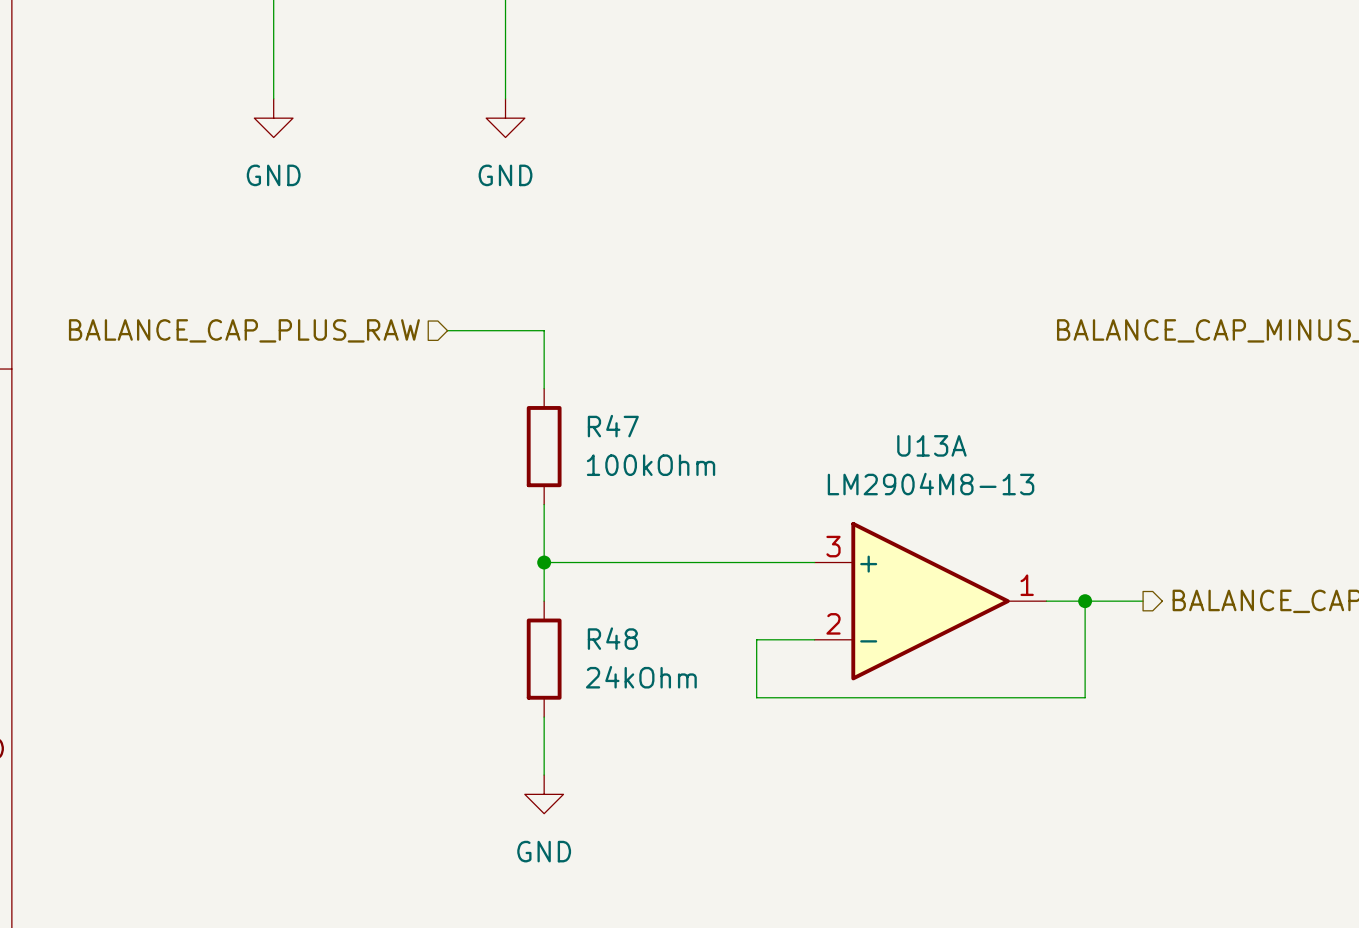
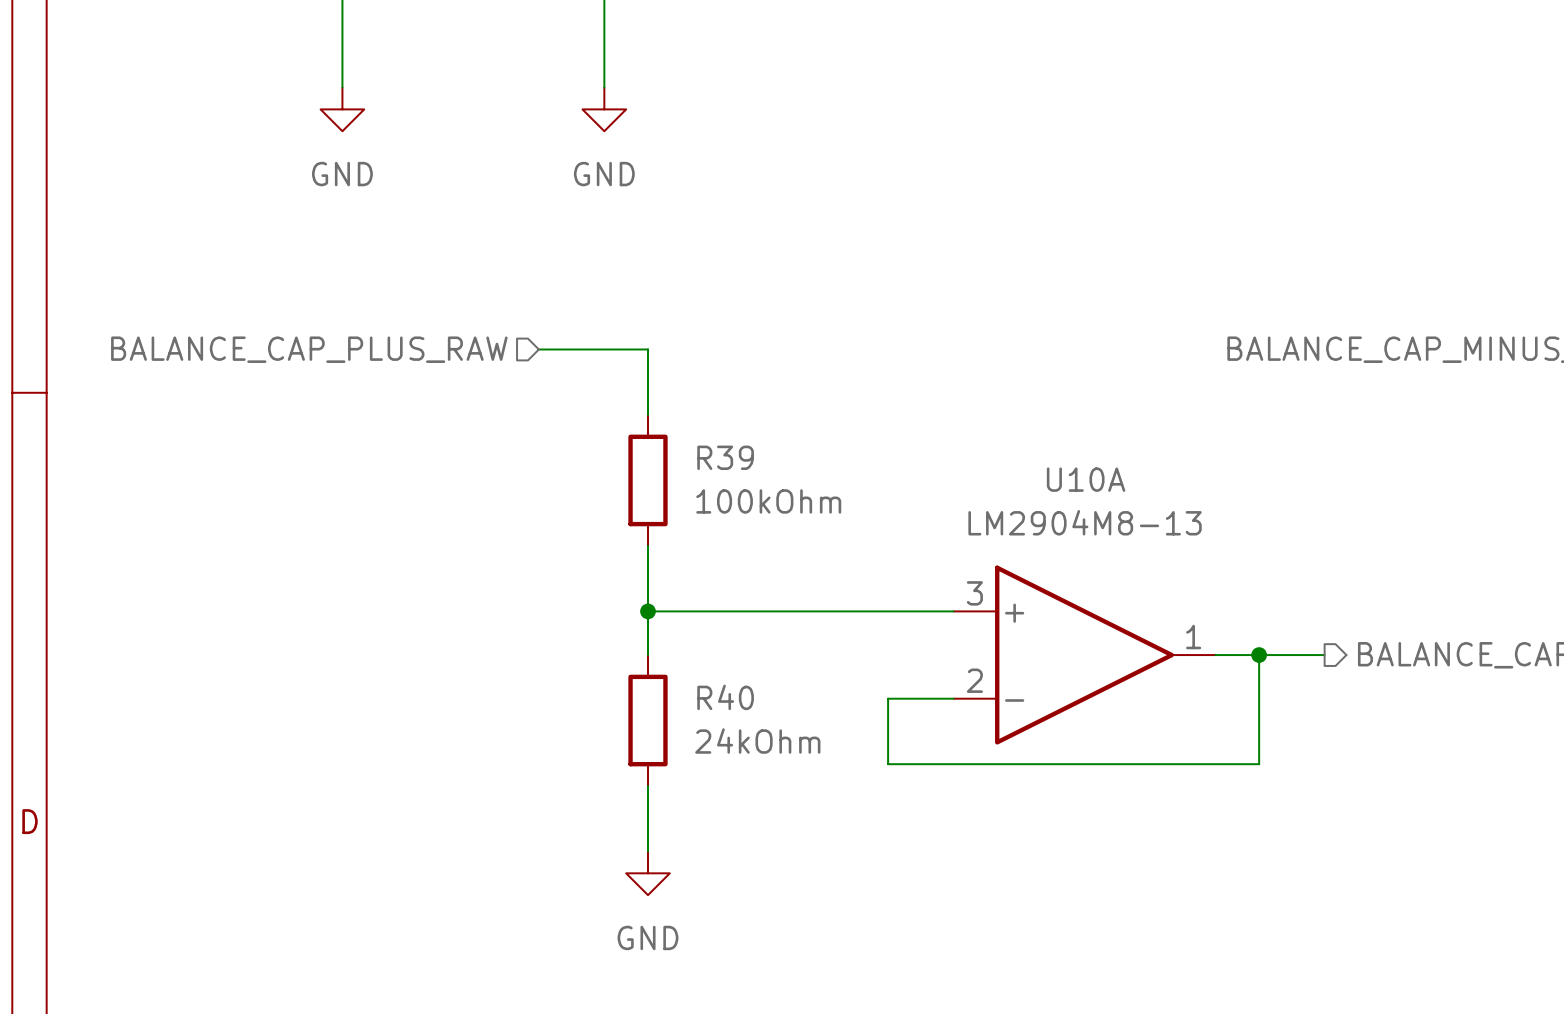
R47 name: R47 (613, 426) -> R39 (725, 457)
U13A name: U13A (931, 445) -> U10A (1086, 479)
R48 name: R48 (612, 638) -> R40 (725, 697)

